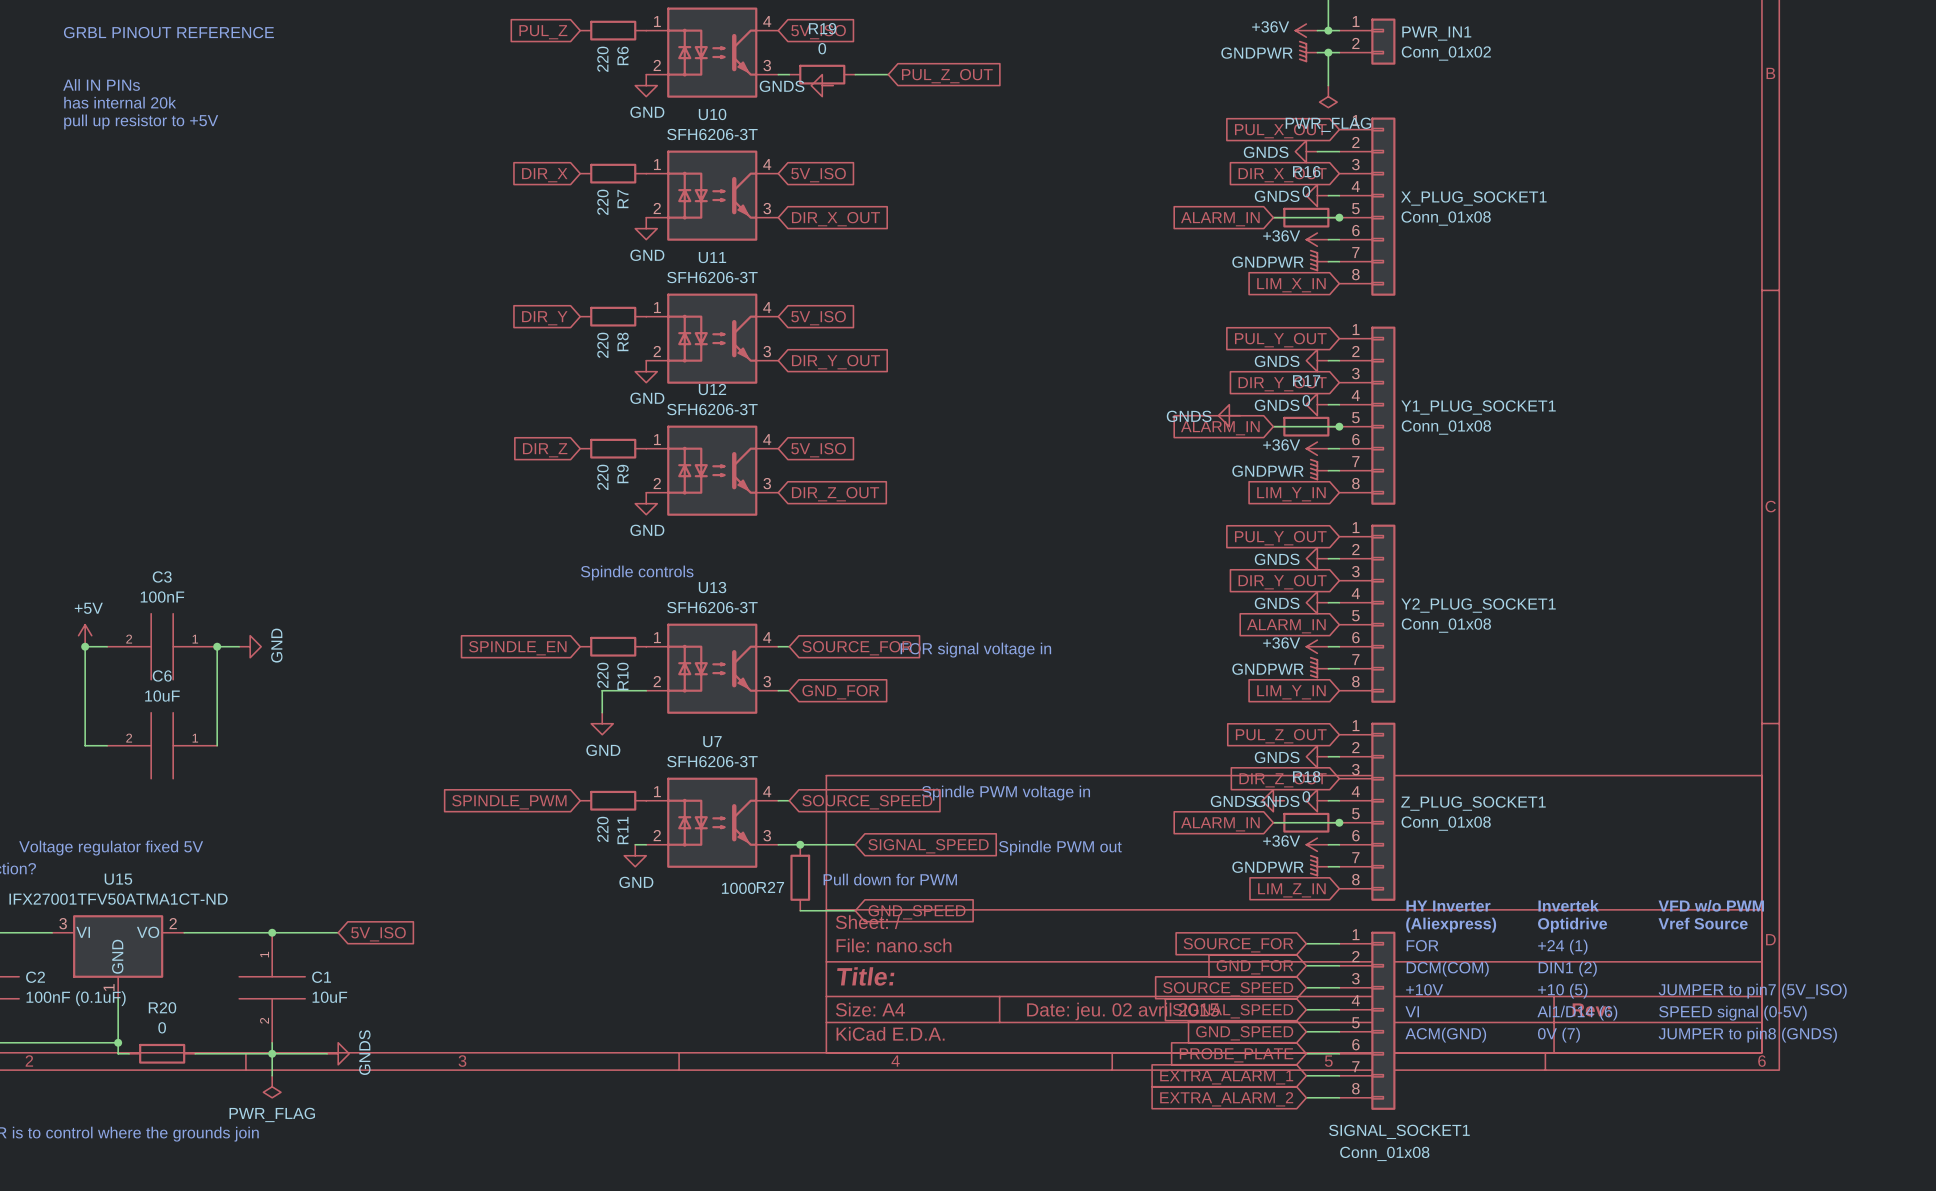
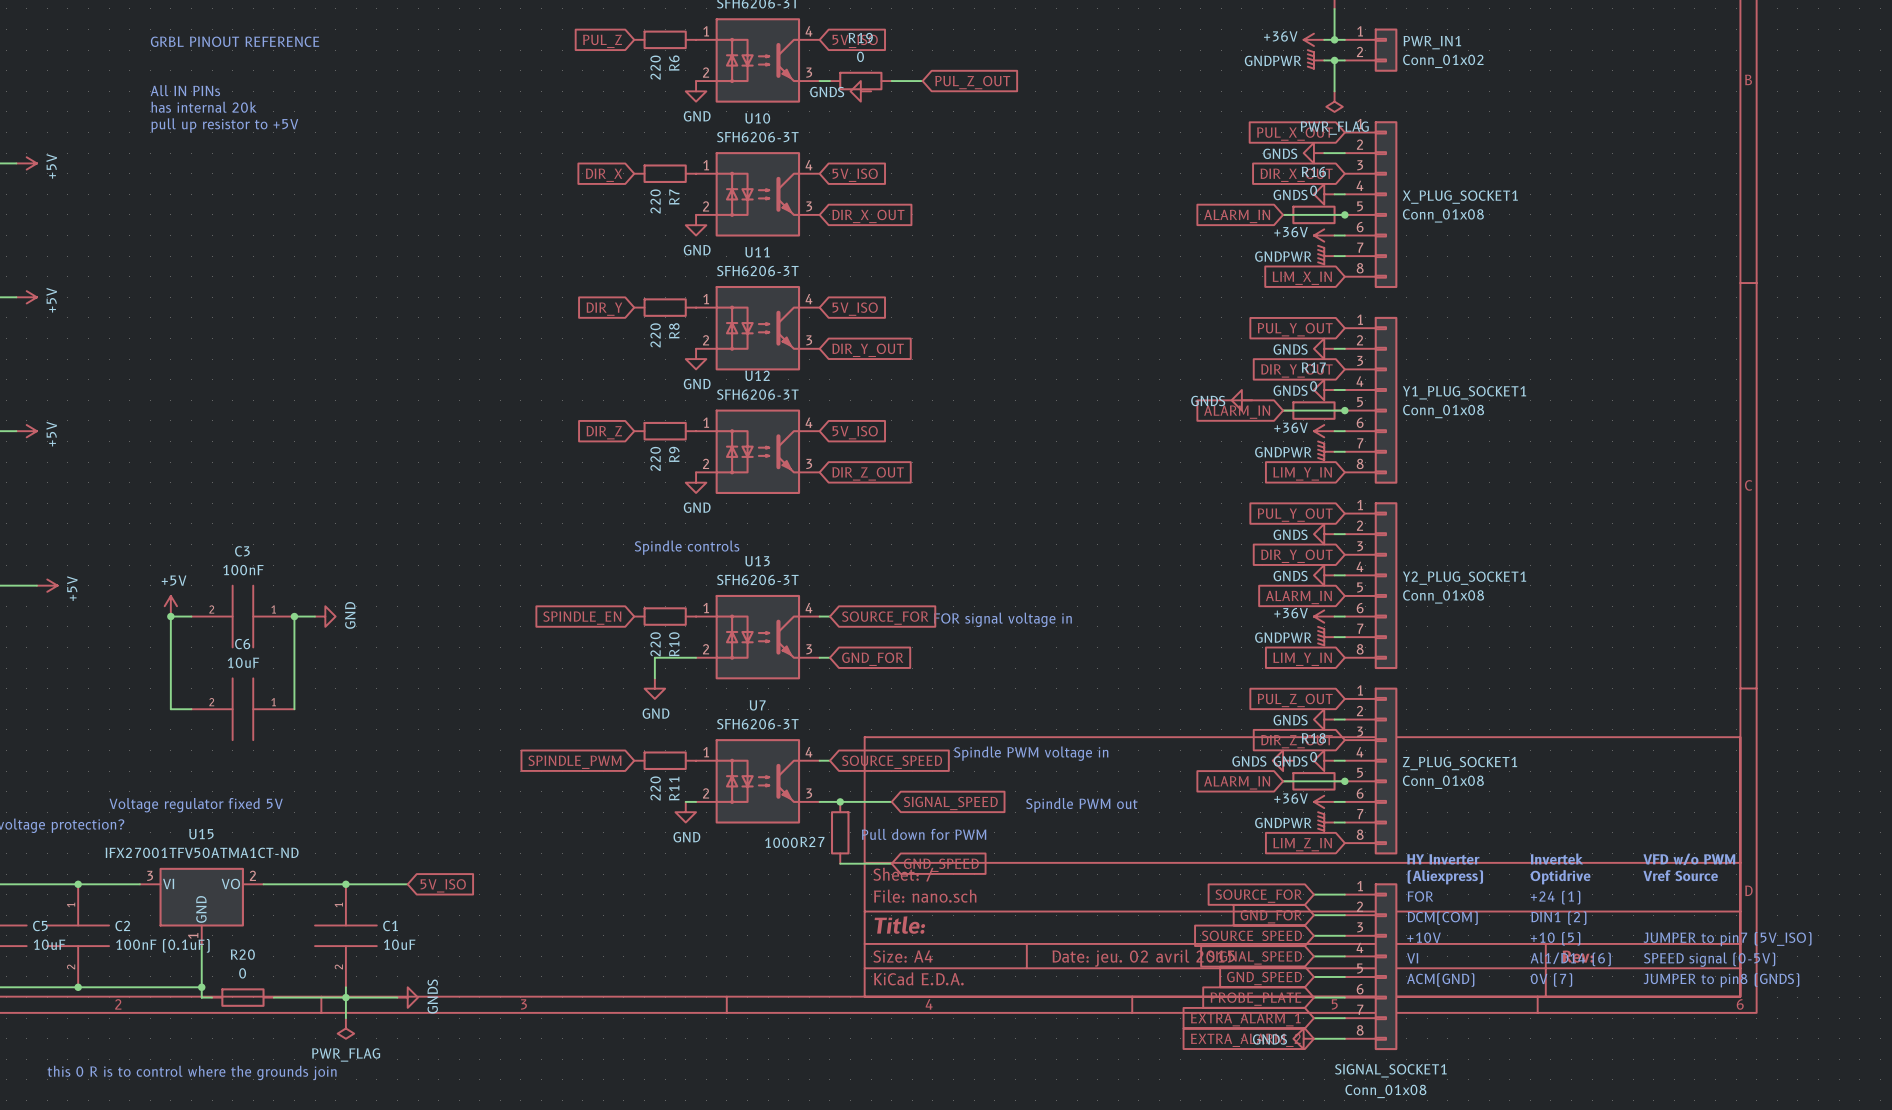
power symbol: none -> GNDS (1303, 1038)

